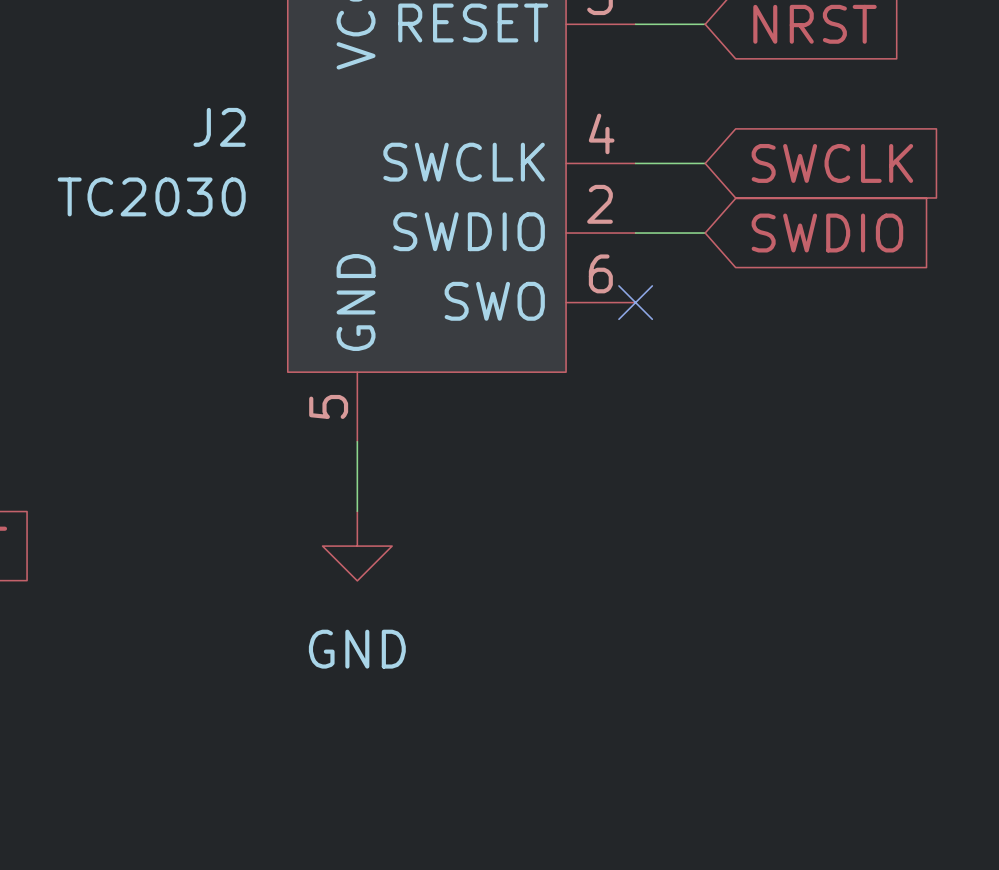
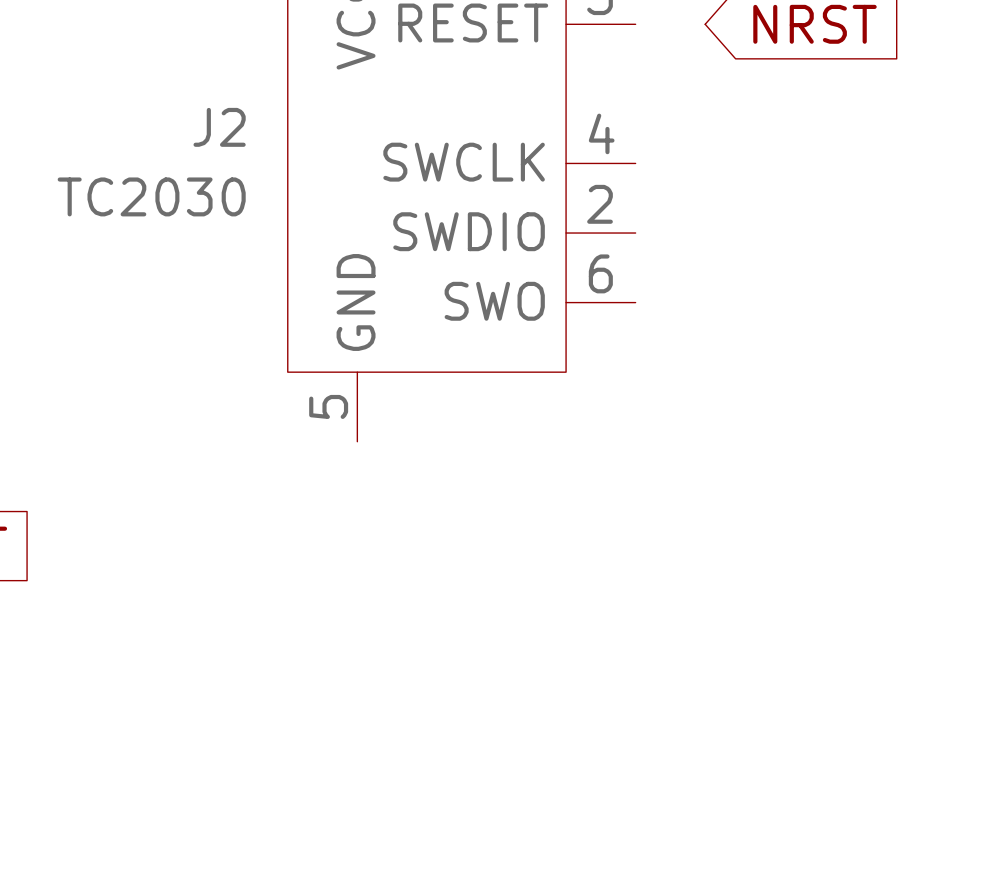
wire: (635, 24) (705, 24) -> none
wire: (635, 163) (705, 163) -> none
global label: SWCLK (832, 163) -> none
wire: (635, 233) (705, 233) -> none
global label: SWDIO (827, 233) -> none
no-connect mark: (635, 302) -> none
wire: (357, 441) (357, 511) -> none
power symbol: GND (357, 546) -> none

